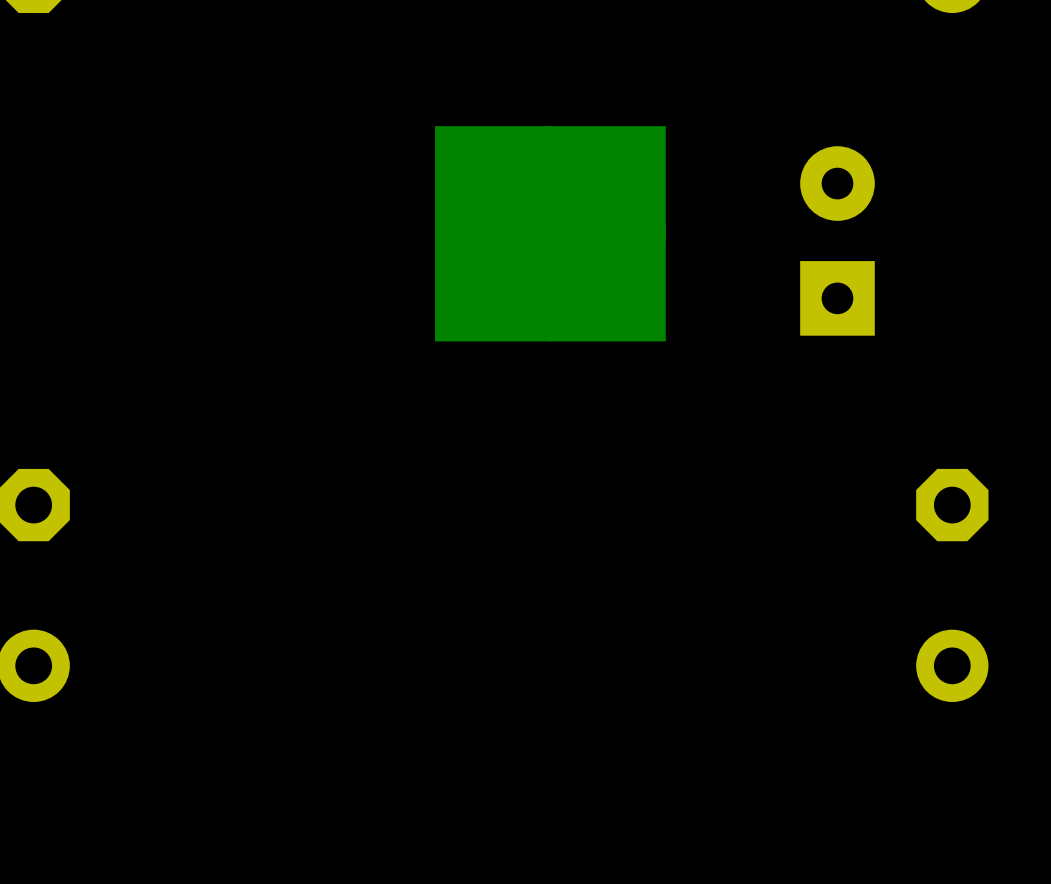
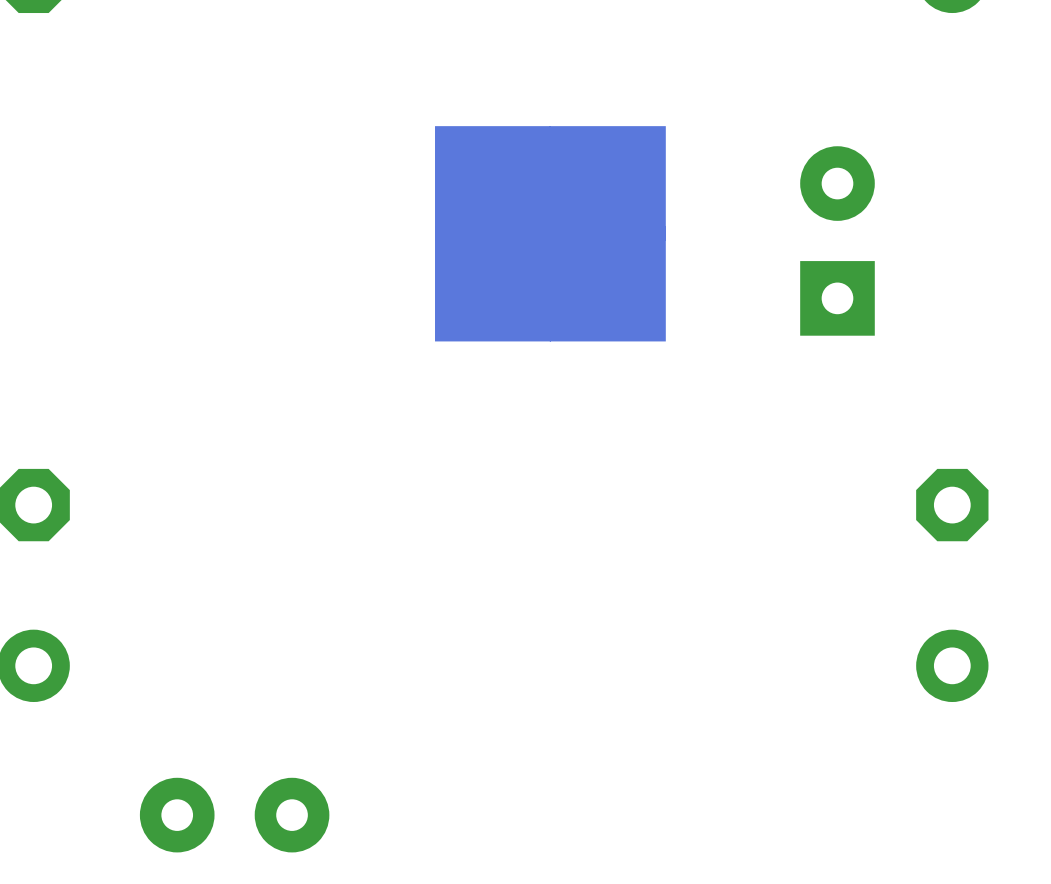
part: none -> (234, 815)

